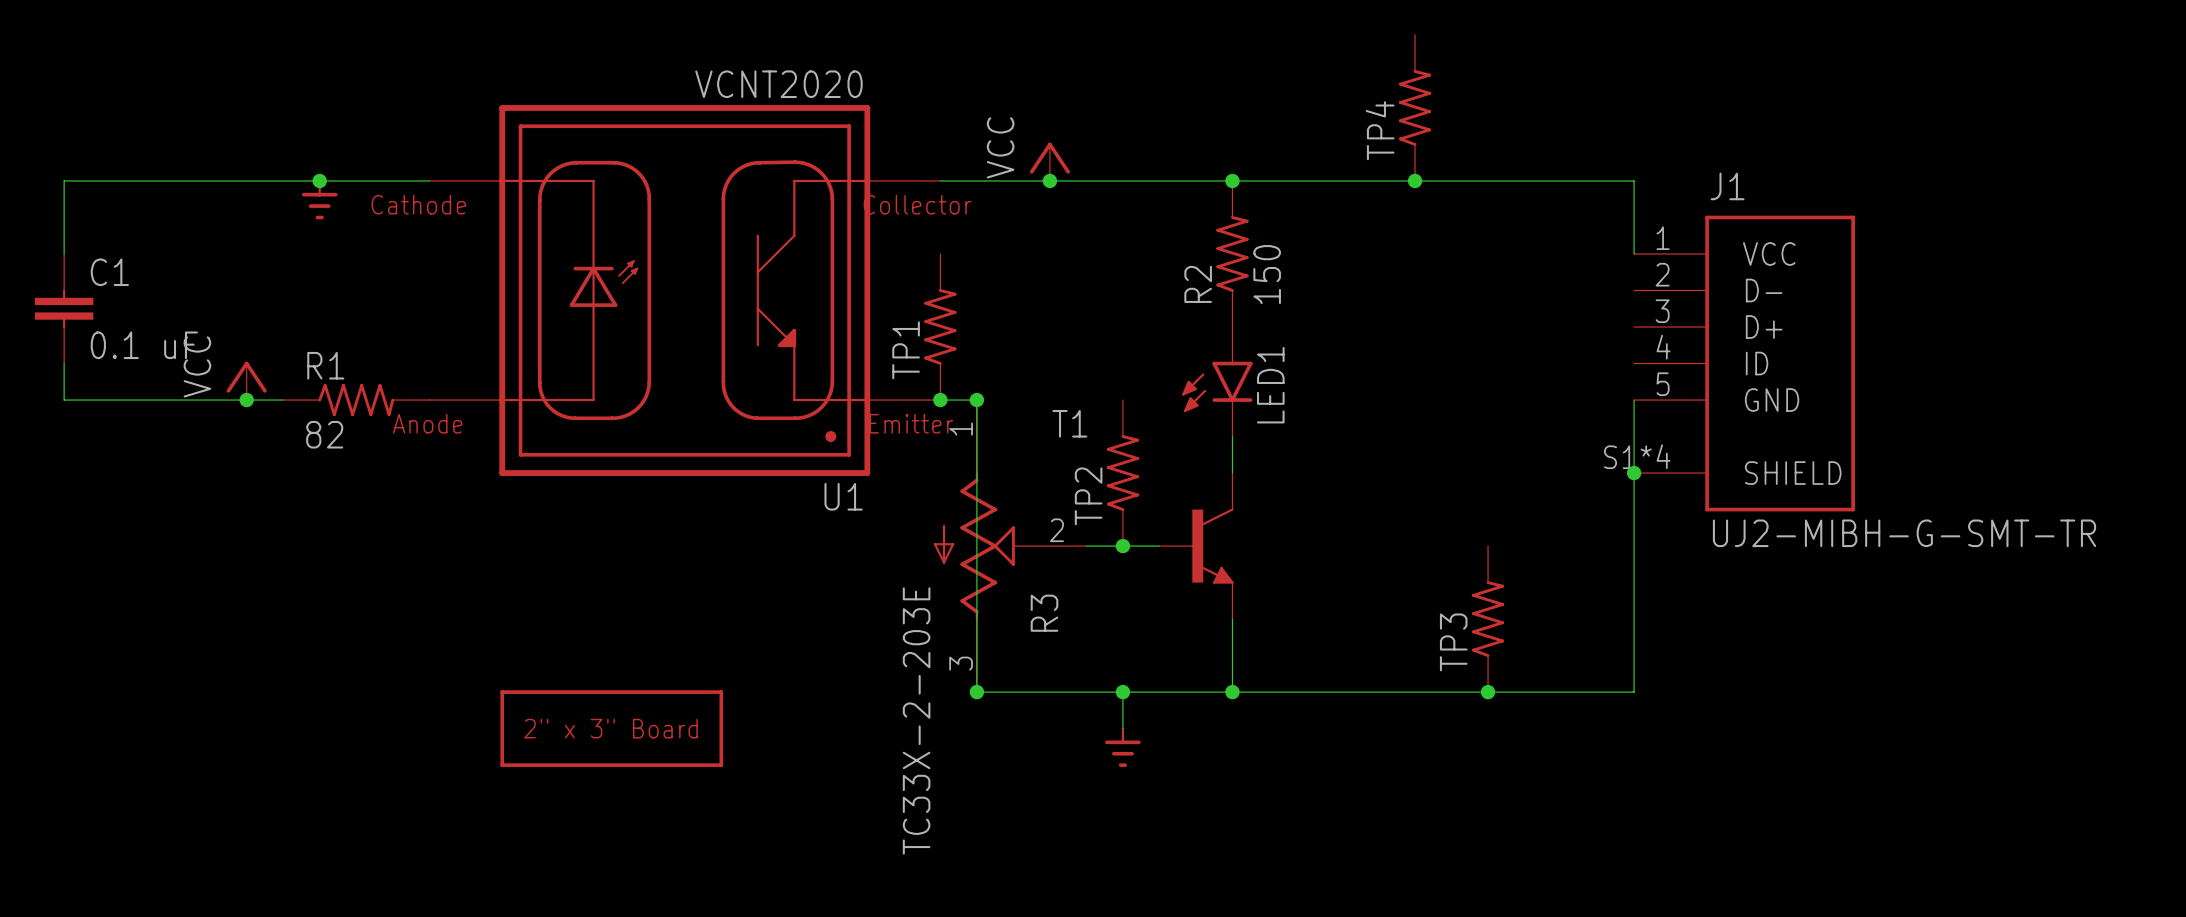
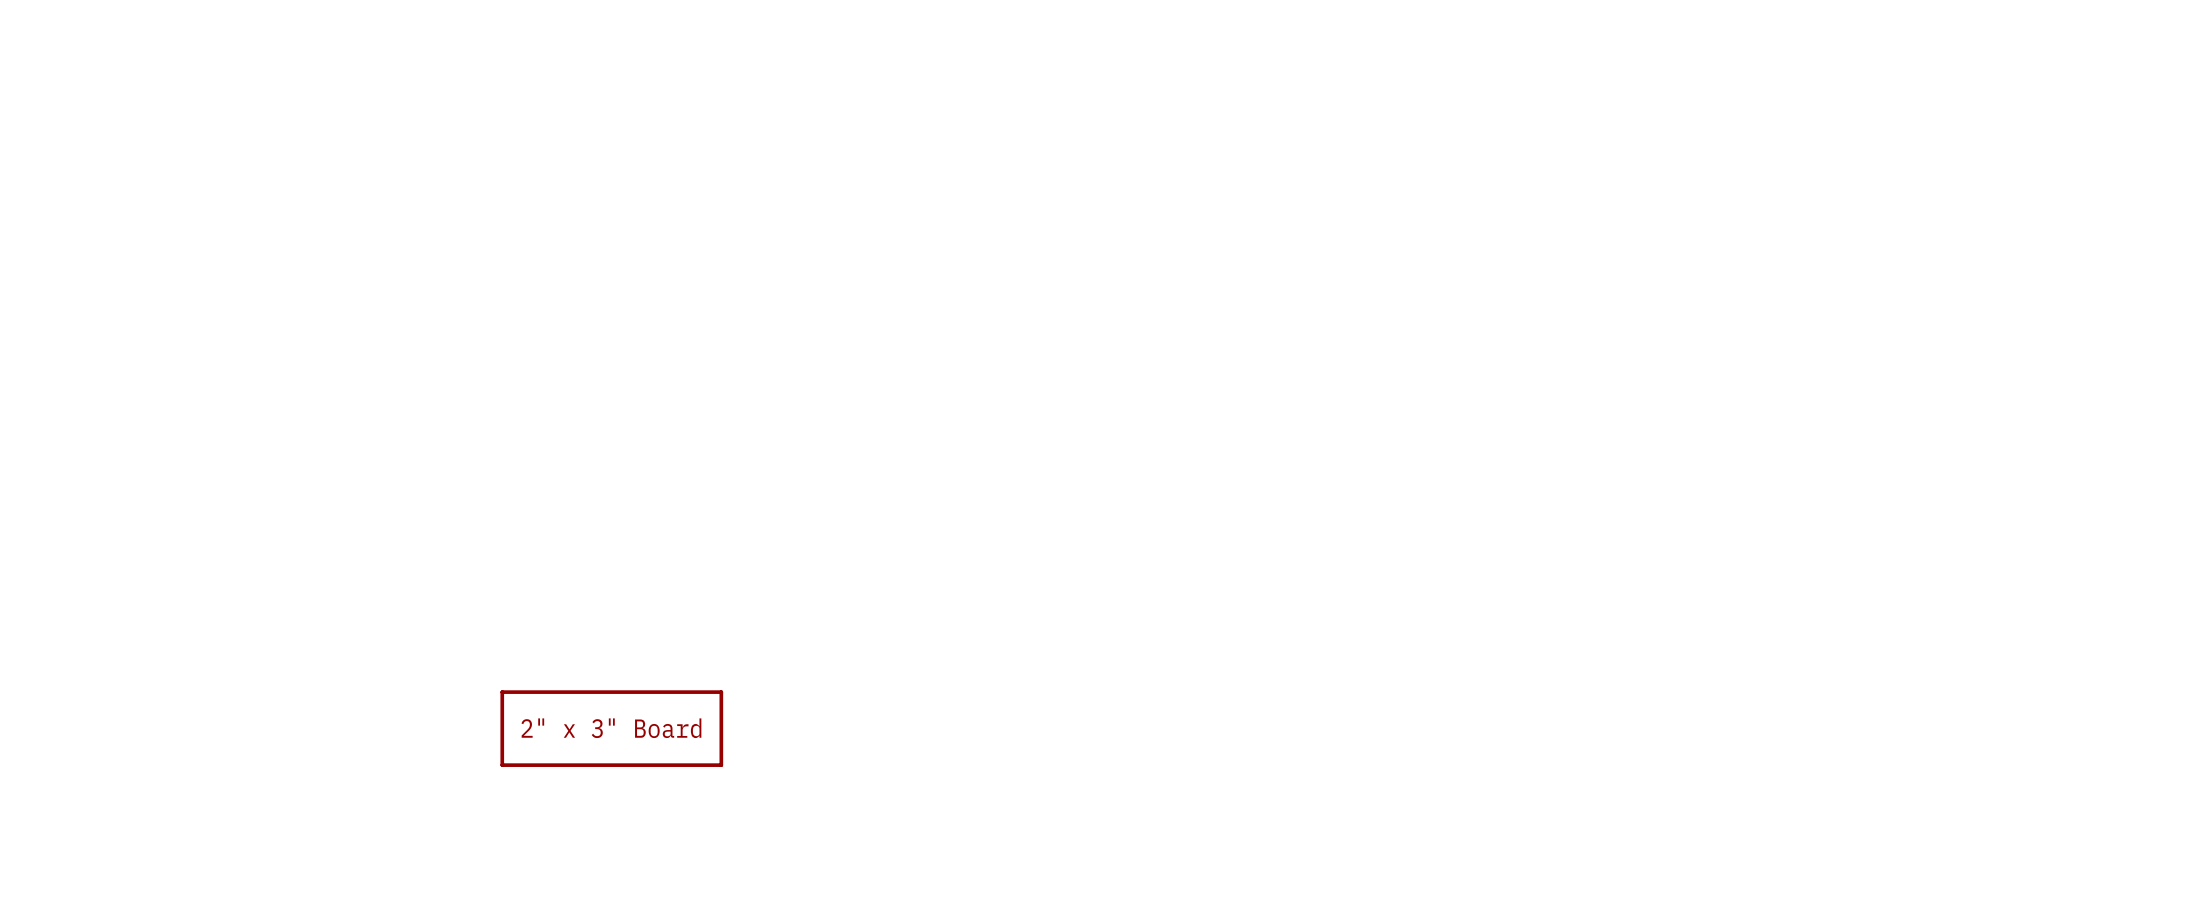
TP4: (1415, 107) -> none
power symbol: VCC (1049, 161) -> none
junction: (319, 180) -> none
wire: (429, 180) (64, 180) (64, 253) -> none
wire: (940, 180) (1634, 180) (1634, 253) -> none
junction: (1049, 180) -> none
junction: (1232, 180) -> none
junction: (1415, 180) -> none
power symbol: (319, 199) -> none
R2: 150 (1232, 253) -> none
U1: VCNT2020 (684, 290) -> none
C1: 0.1 uF (64, 308) -> none
TP1: (940, 327) -> none
wire: (64, 363) (64, 400) (283, 400) -> none
J1: UJ2-MIBH-G-SMT-TR (1744, 363) -> none
power symbol: VCC (246, 380) -> none
LED1: (1217, 381) -> none
junction: (246, 400) -> none
R1: 82 (356, 400) -> none
wire: (940, 400) (976, 400) (976, 692) (1634, 692) (1634, 400) -> none
junction: (940, 400) -> none
junction: (976, 400) -> none
wire: (1232, 436) (1232, 473) -> none
TP2: (1122, 473) -> none
junction: (1634, 473) -> none
R3: TC33X-2-203E (1010, 546) -> none
wire: (1086, 546) (1159, 546) -> none
junction: (1122, 546) -> none
T1: (1196, 546) -> none
wire: (1232, 619) (1232, 692) -> none
TP3: (1488, 619) -> none
junction: (976, 692) -> none
wire: (1122, 692) (1122, 728) -> none
junction: (1122, 692) -> none
junction: (1232, 692) -> none
junction: (1488, 692) -> none
power symbol: (1122, 747) -> none

